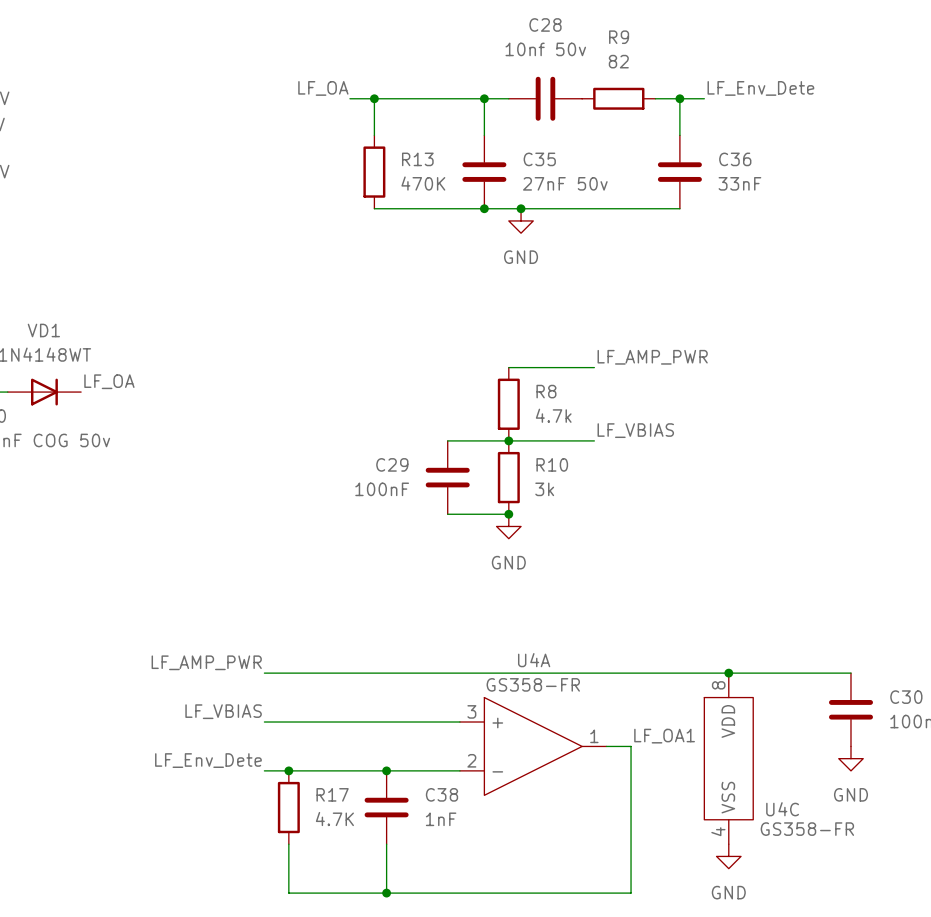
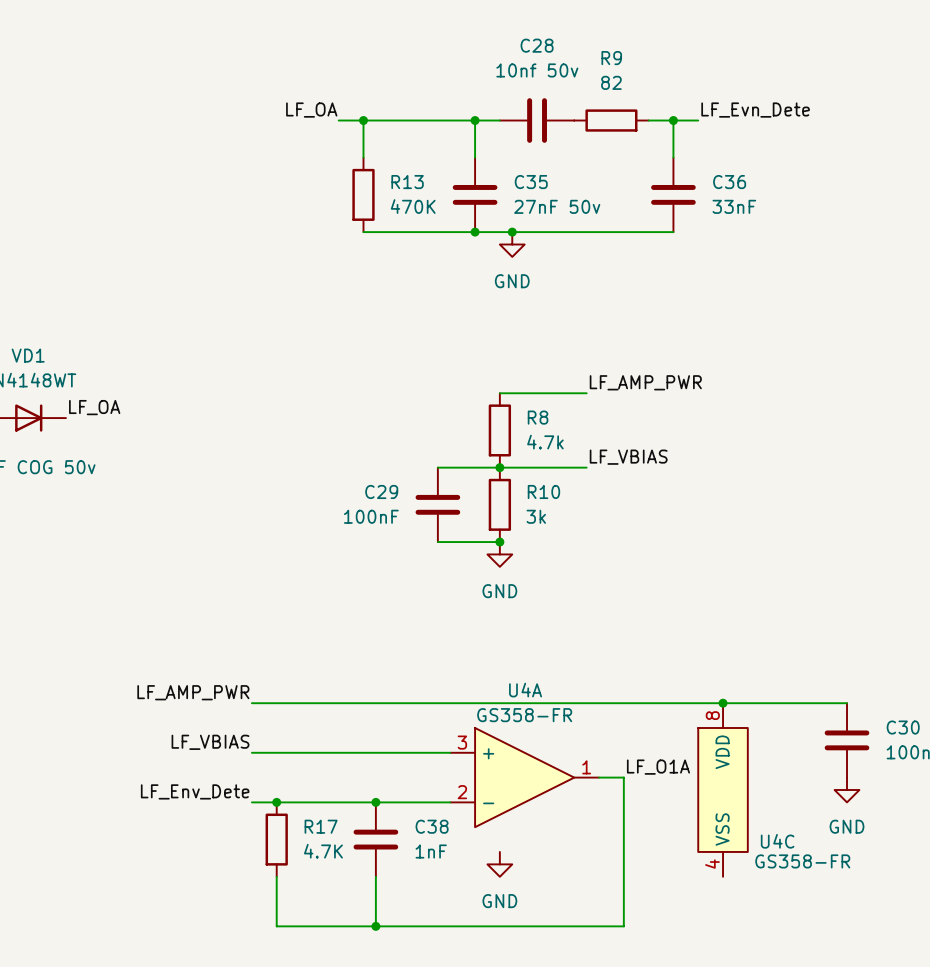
label: LF_Env_Dete (760, 88) -> LF_Evn_Dete (755, 110)
label: LF_OA1 (664, 736) -> LF_O1A (658, 767)
power symbol position: GND (728, 856) -> GND (499, 864)

